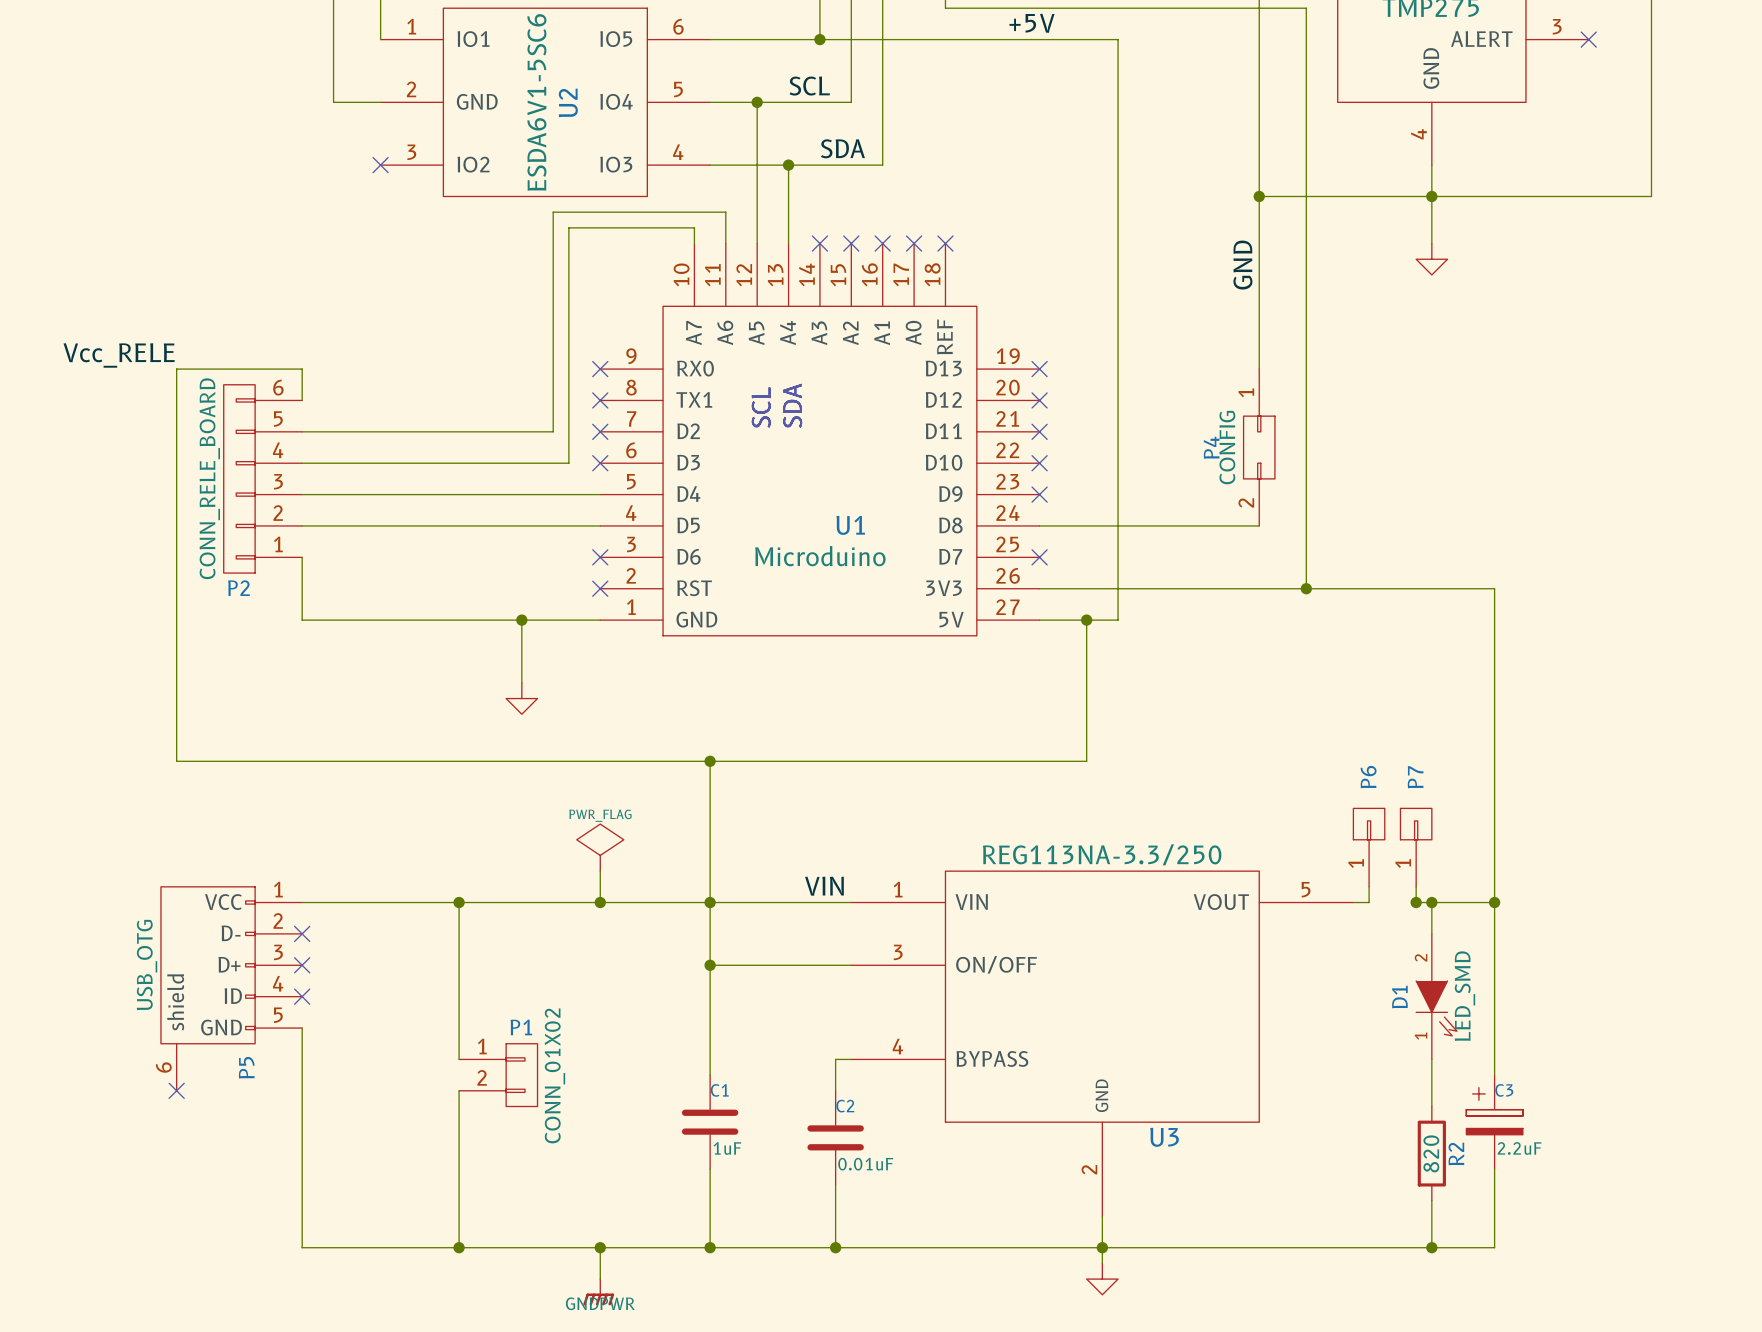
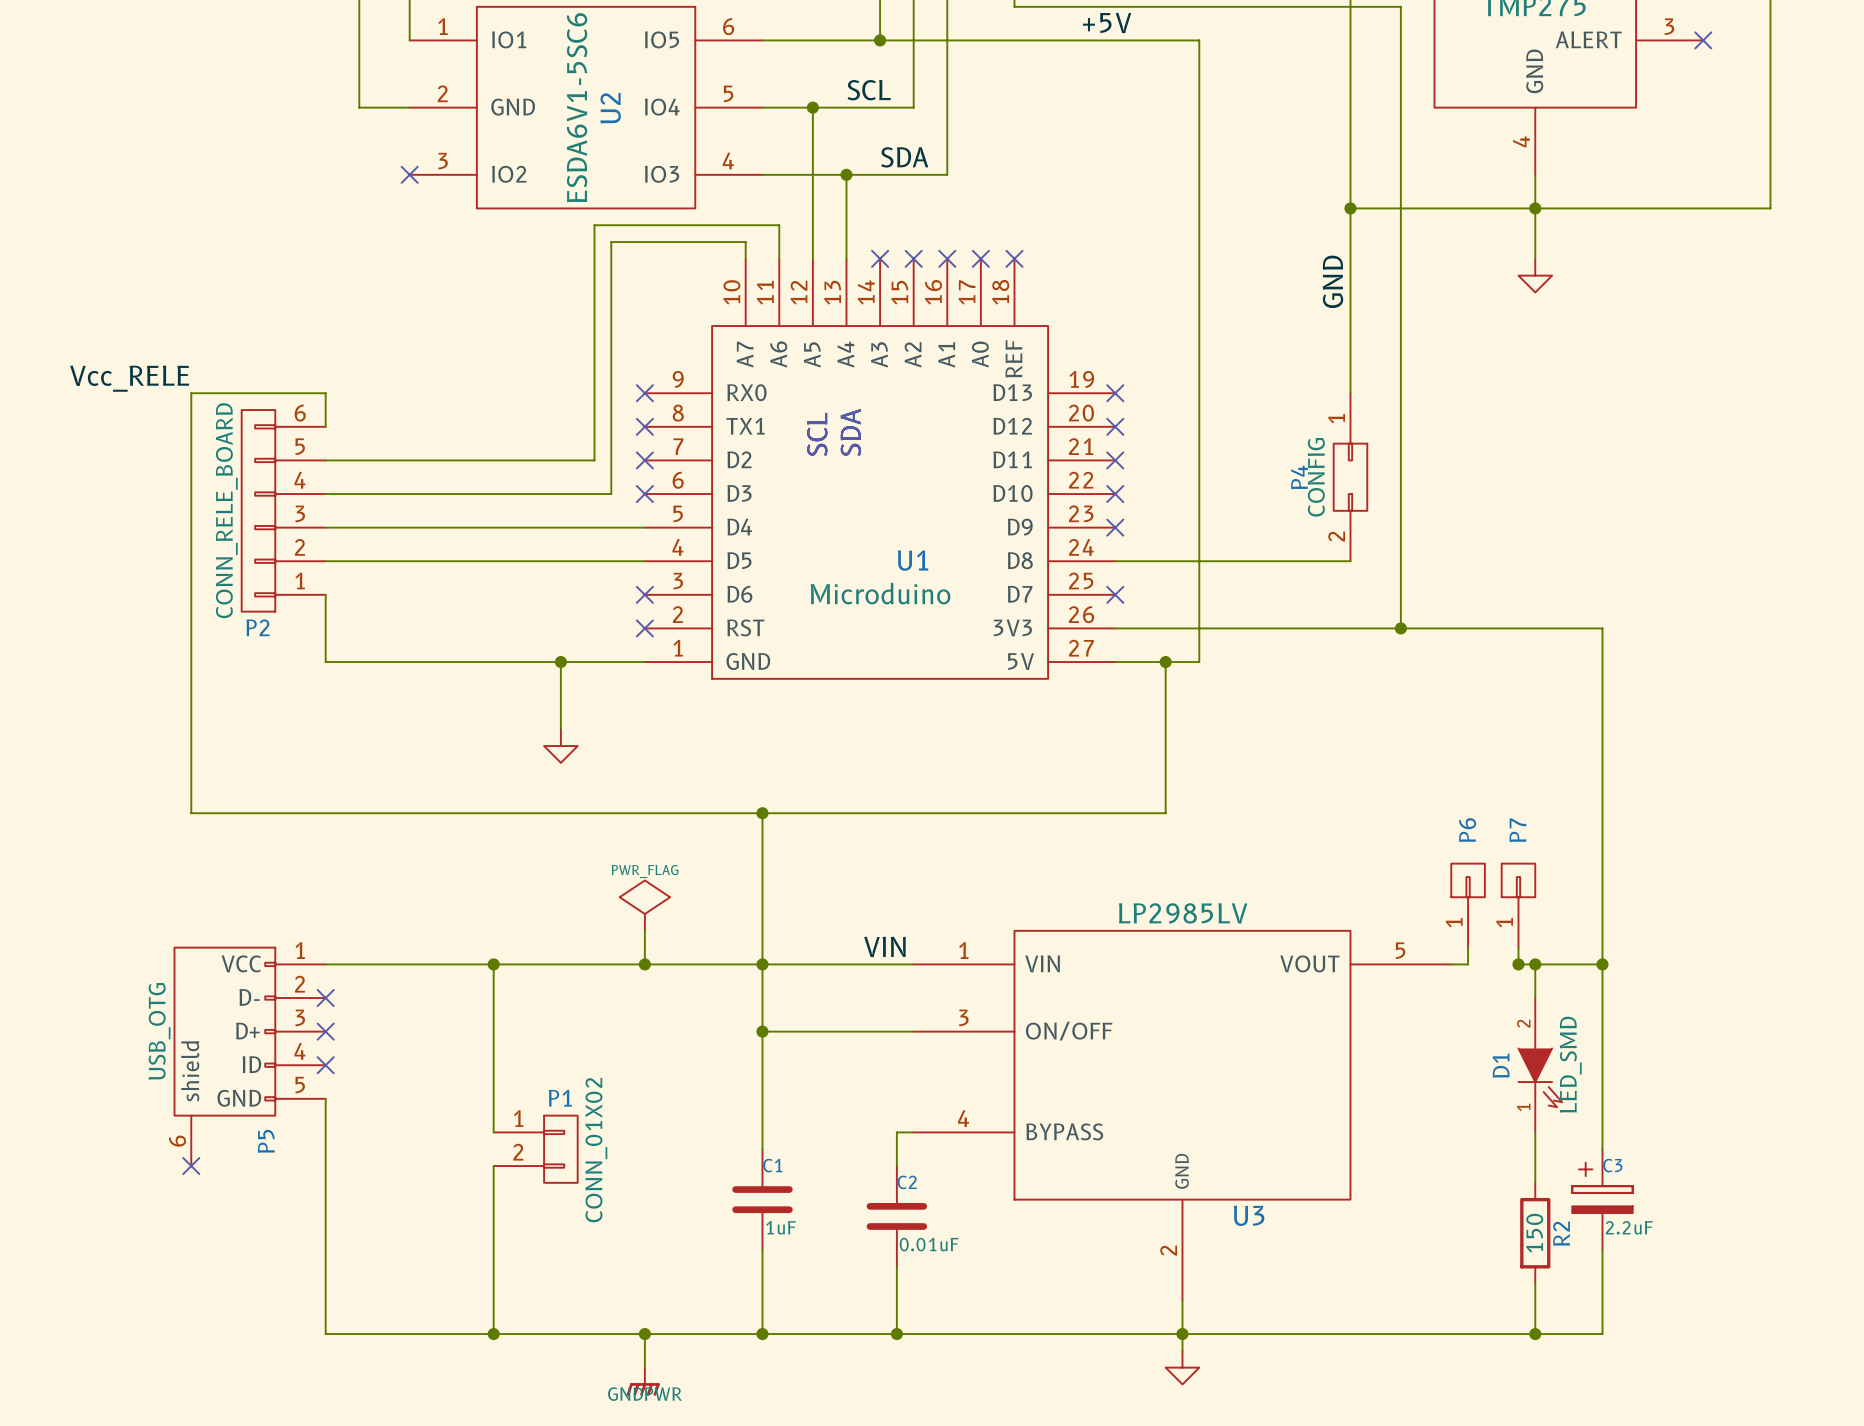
U3 value: REG113NA-3.3/250 (1102, 854) -> LP2985LV (1183, 913)
R2 value: 820 (1431, 1153) -> 150 (1534, 1233)

